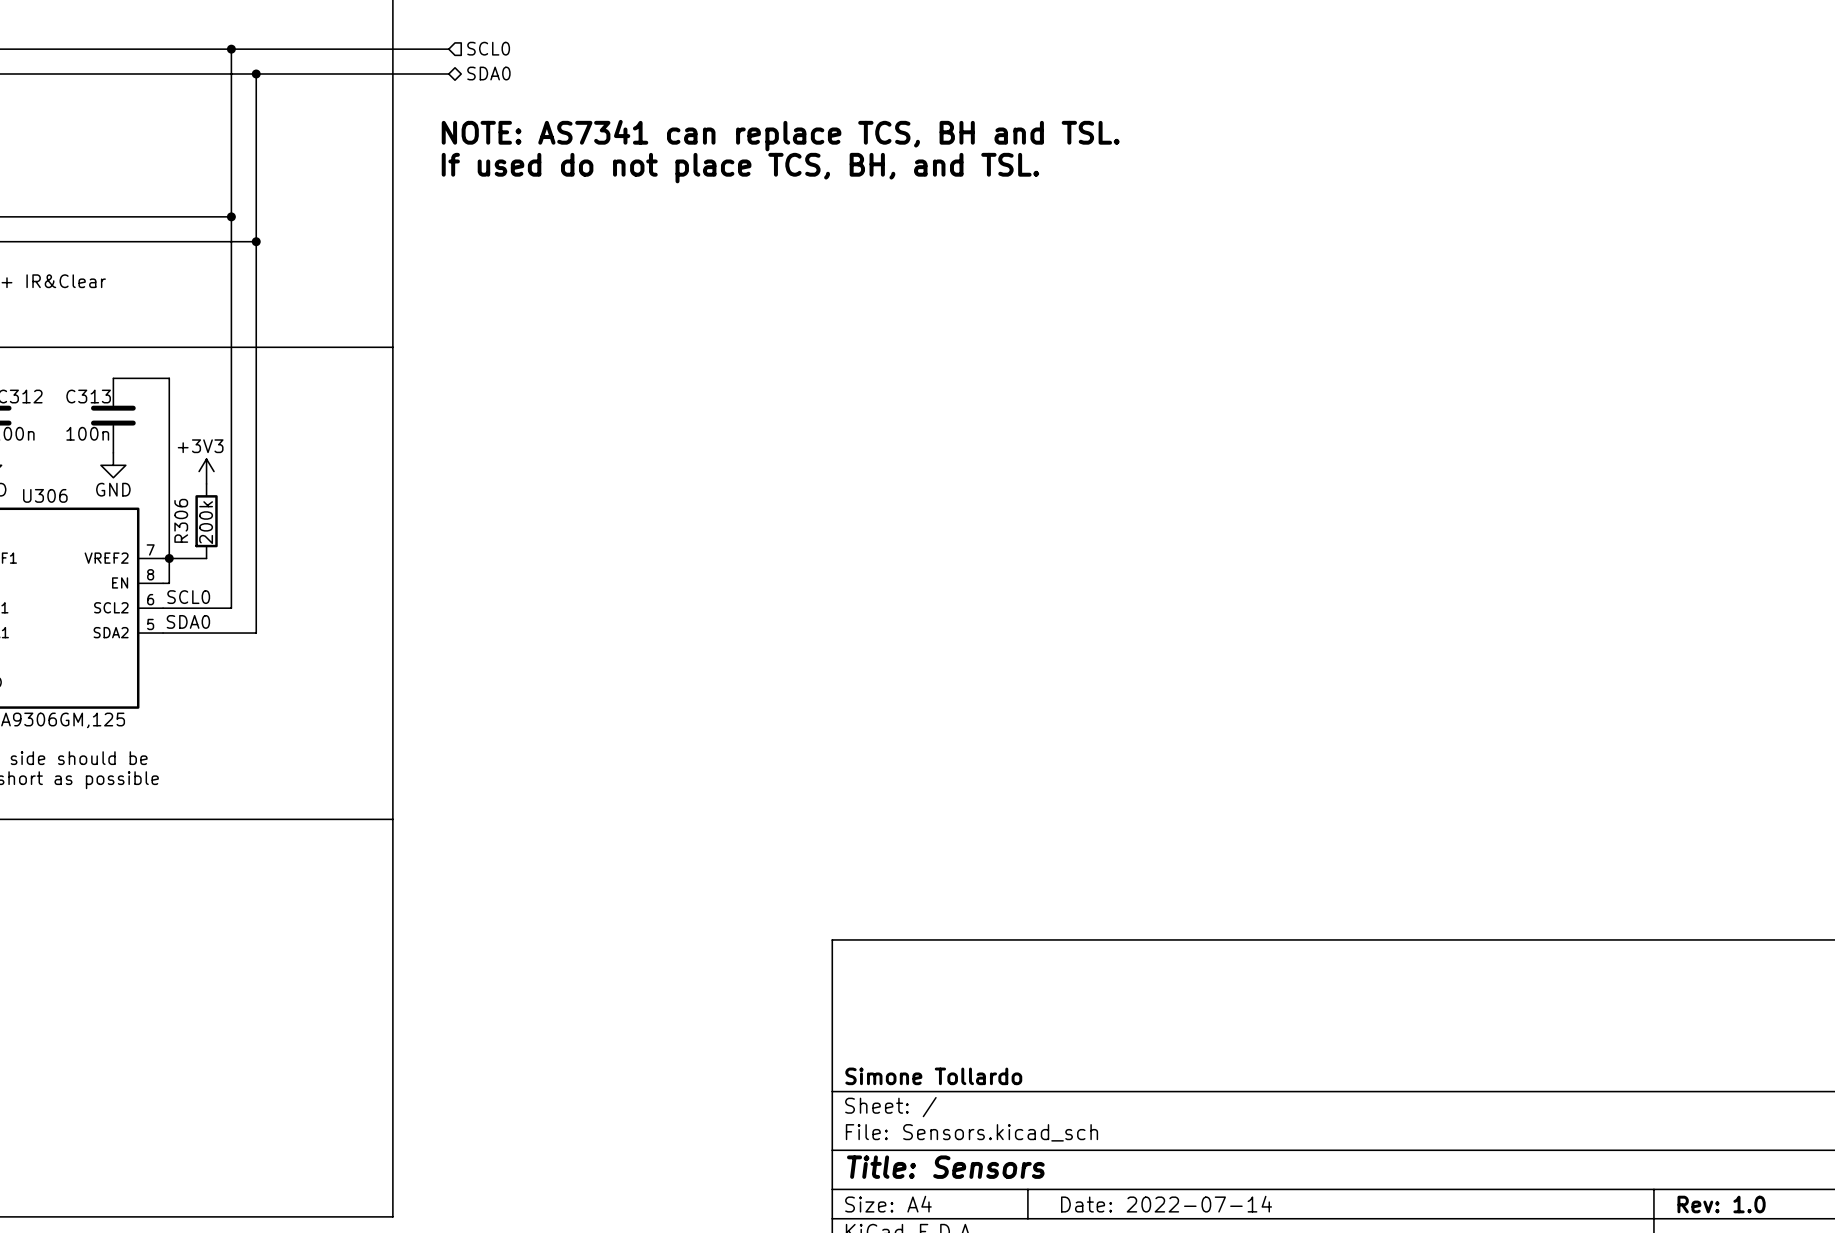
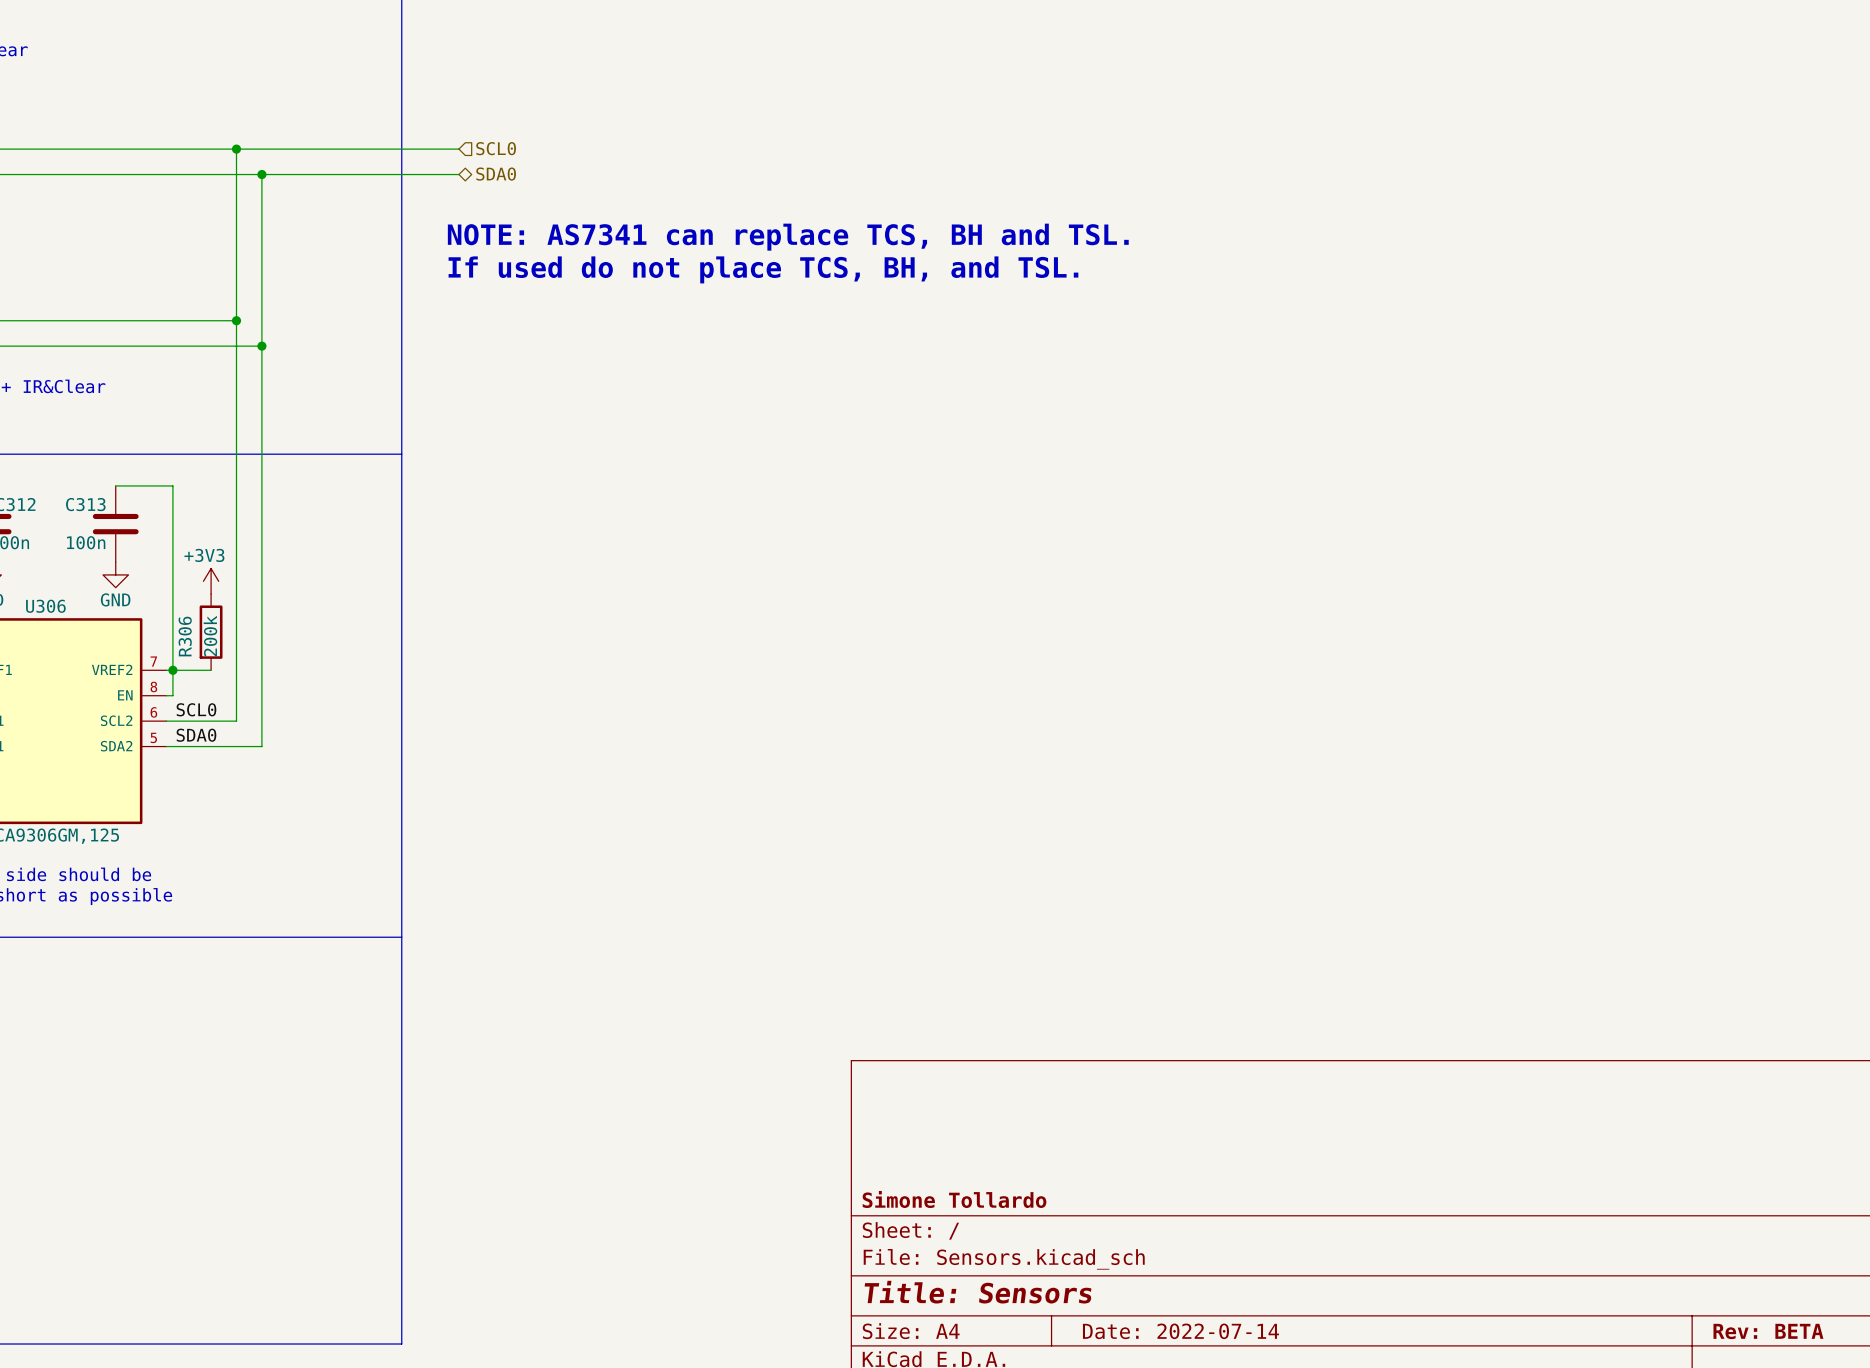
title block: Rev: 1.0 (1721, 1204) -> Rev: BETA (1768, 1331)

